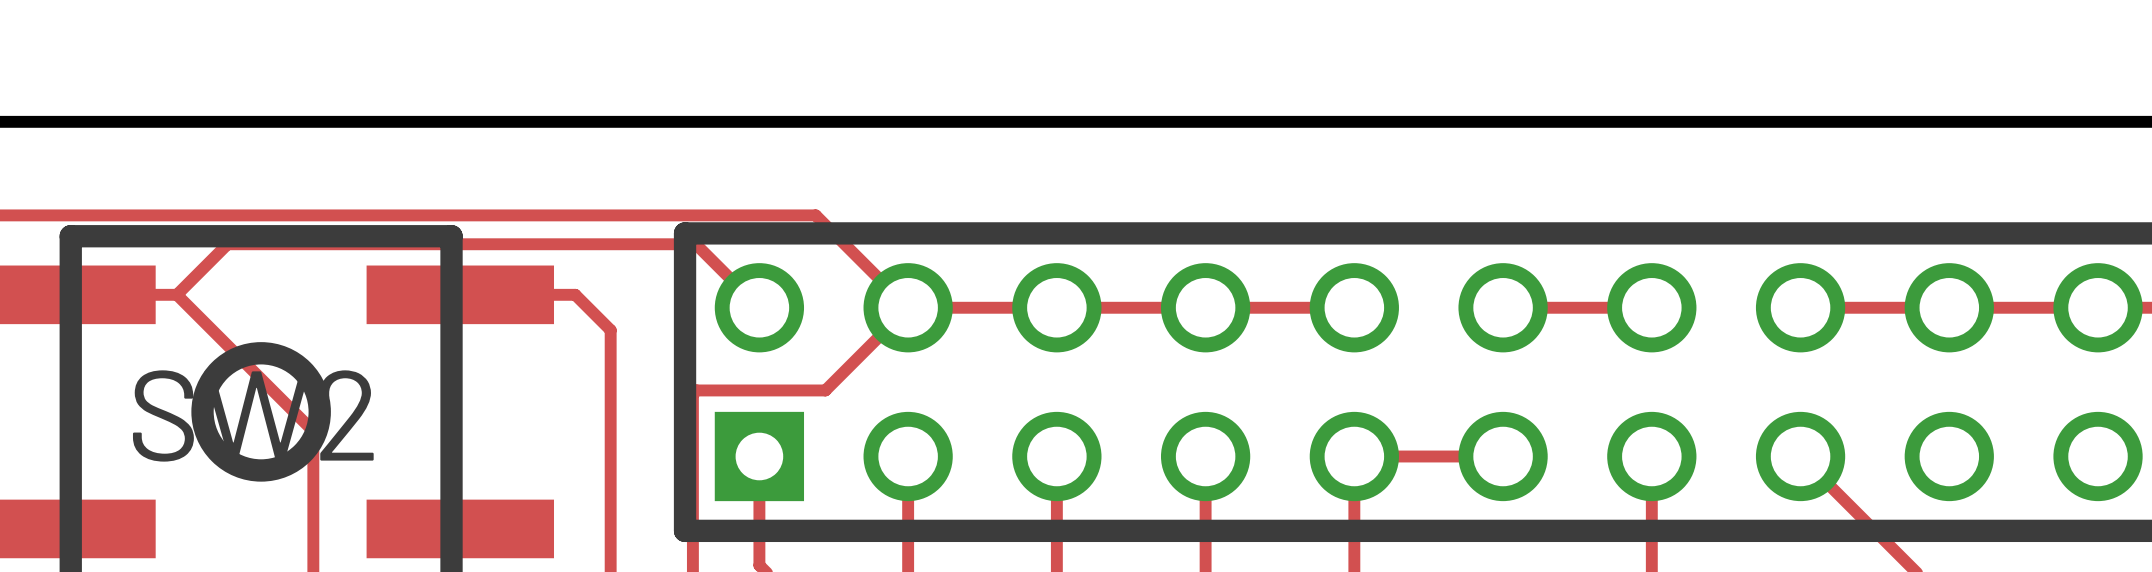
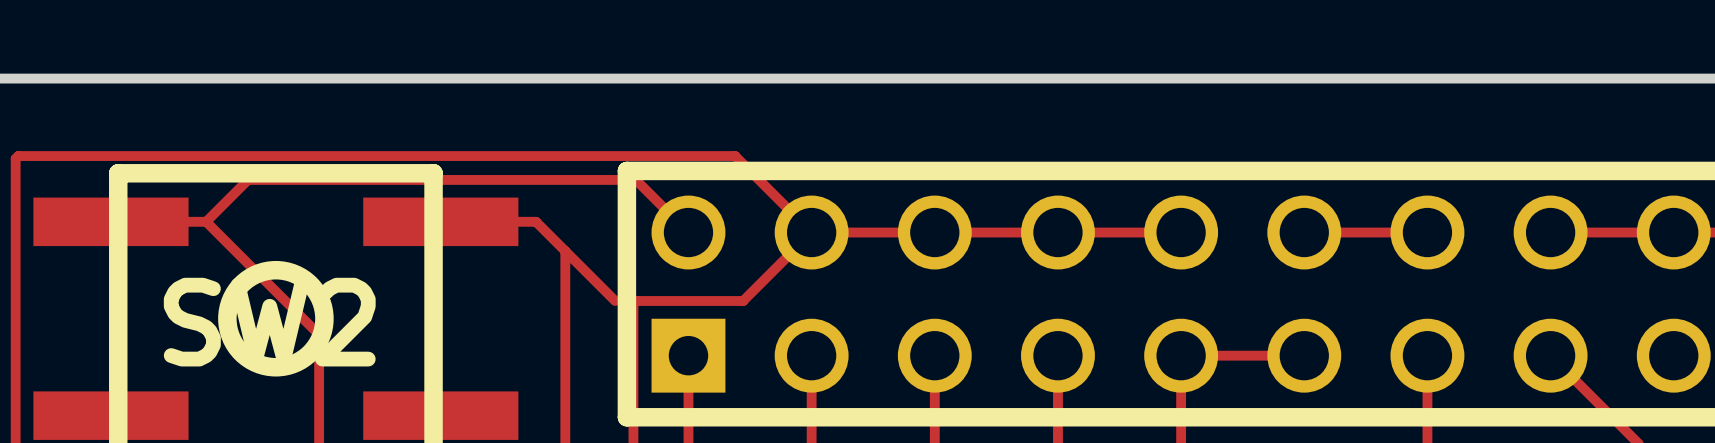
track: none -> (565, 251) (615, 301)

